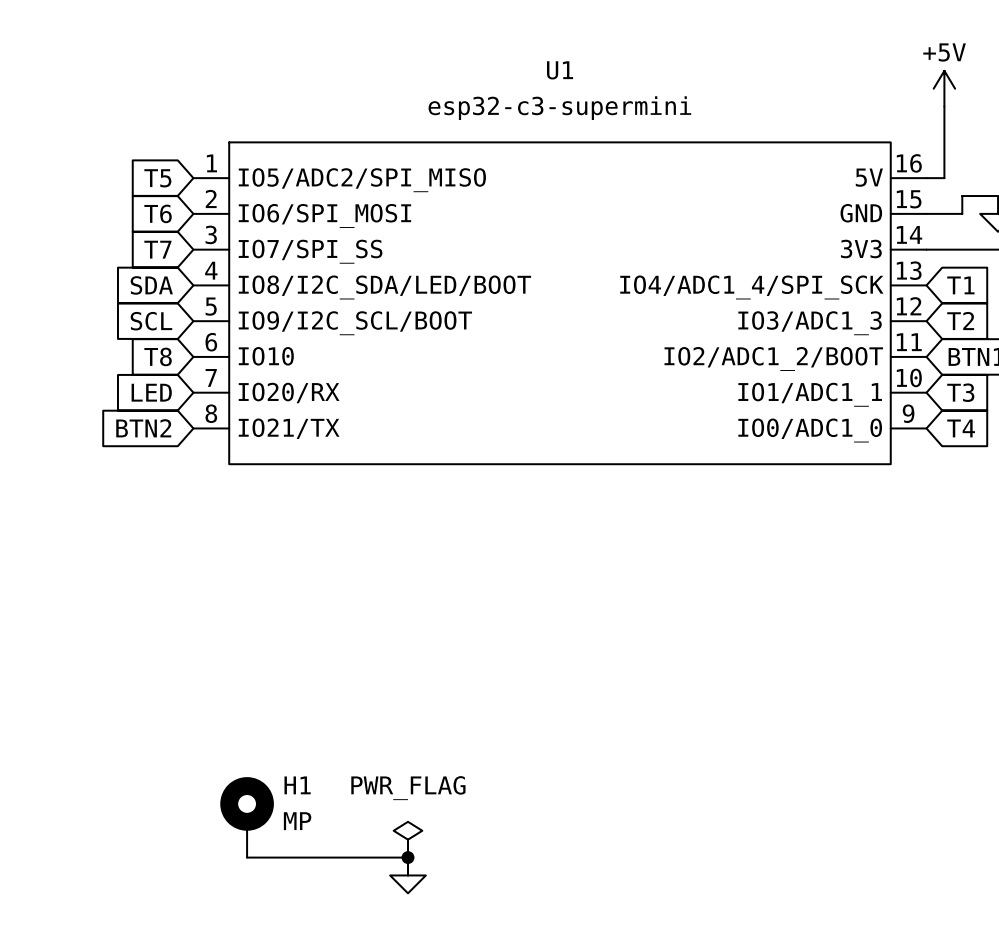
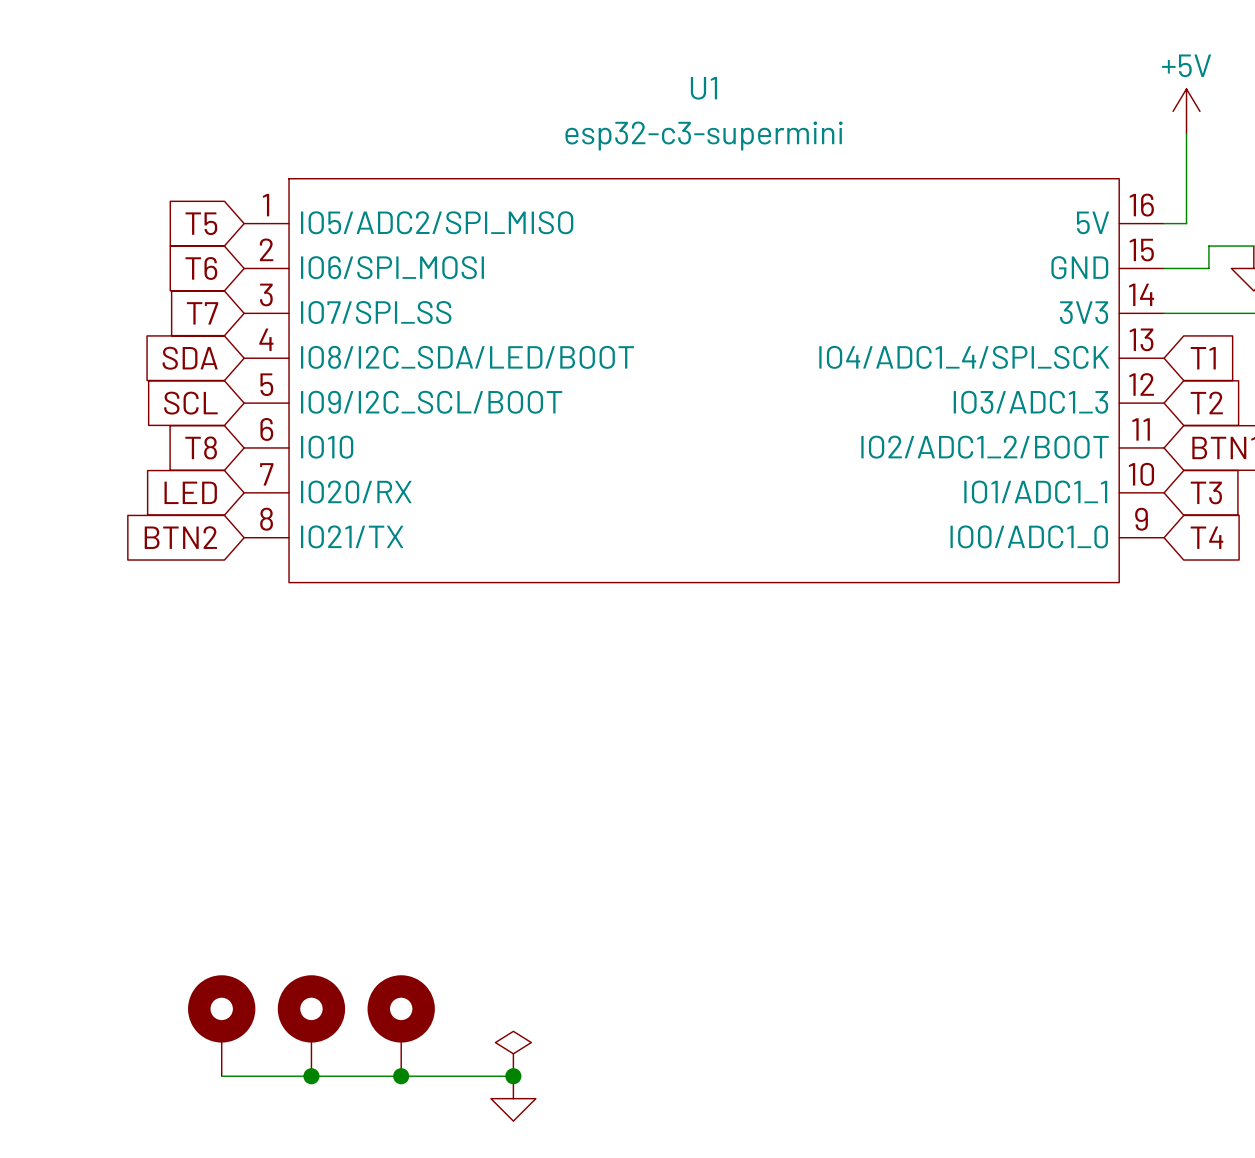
H1 name: H1 (297, 785) -> none
power symbol text: PWR_FLAG (408, 788) -> none
part: none -> (221, 1025)
part: none -> (401, 1025)
H1 value: MP (297, 821) -> none
wire: none -> (221, 1076) (311, 1076)
junction: none -> (311, 1076)
junction: none -> (401, 1076)

